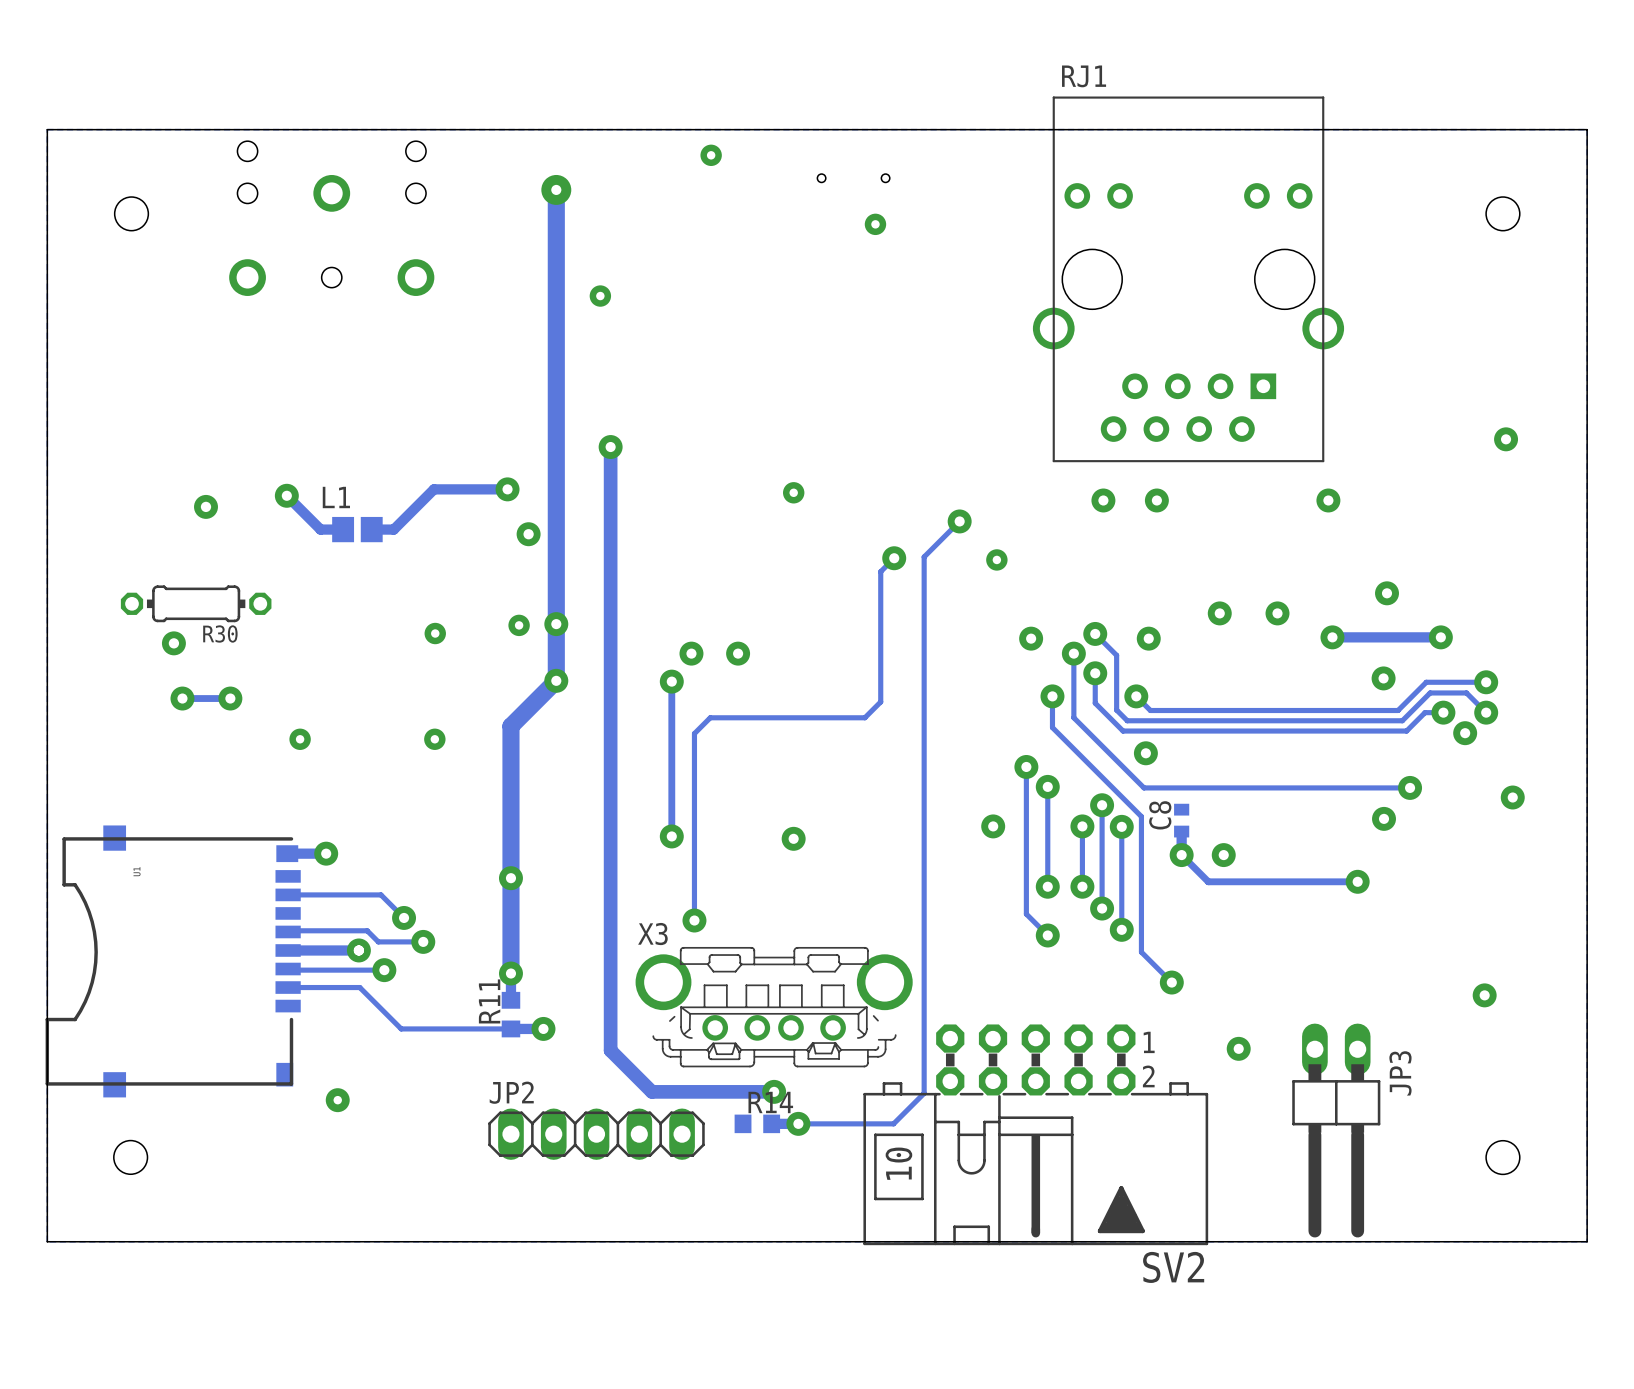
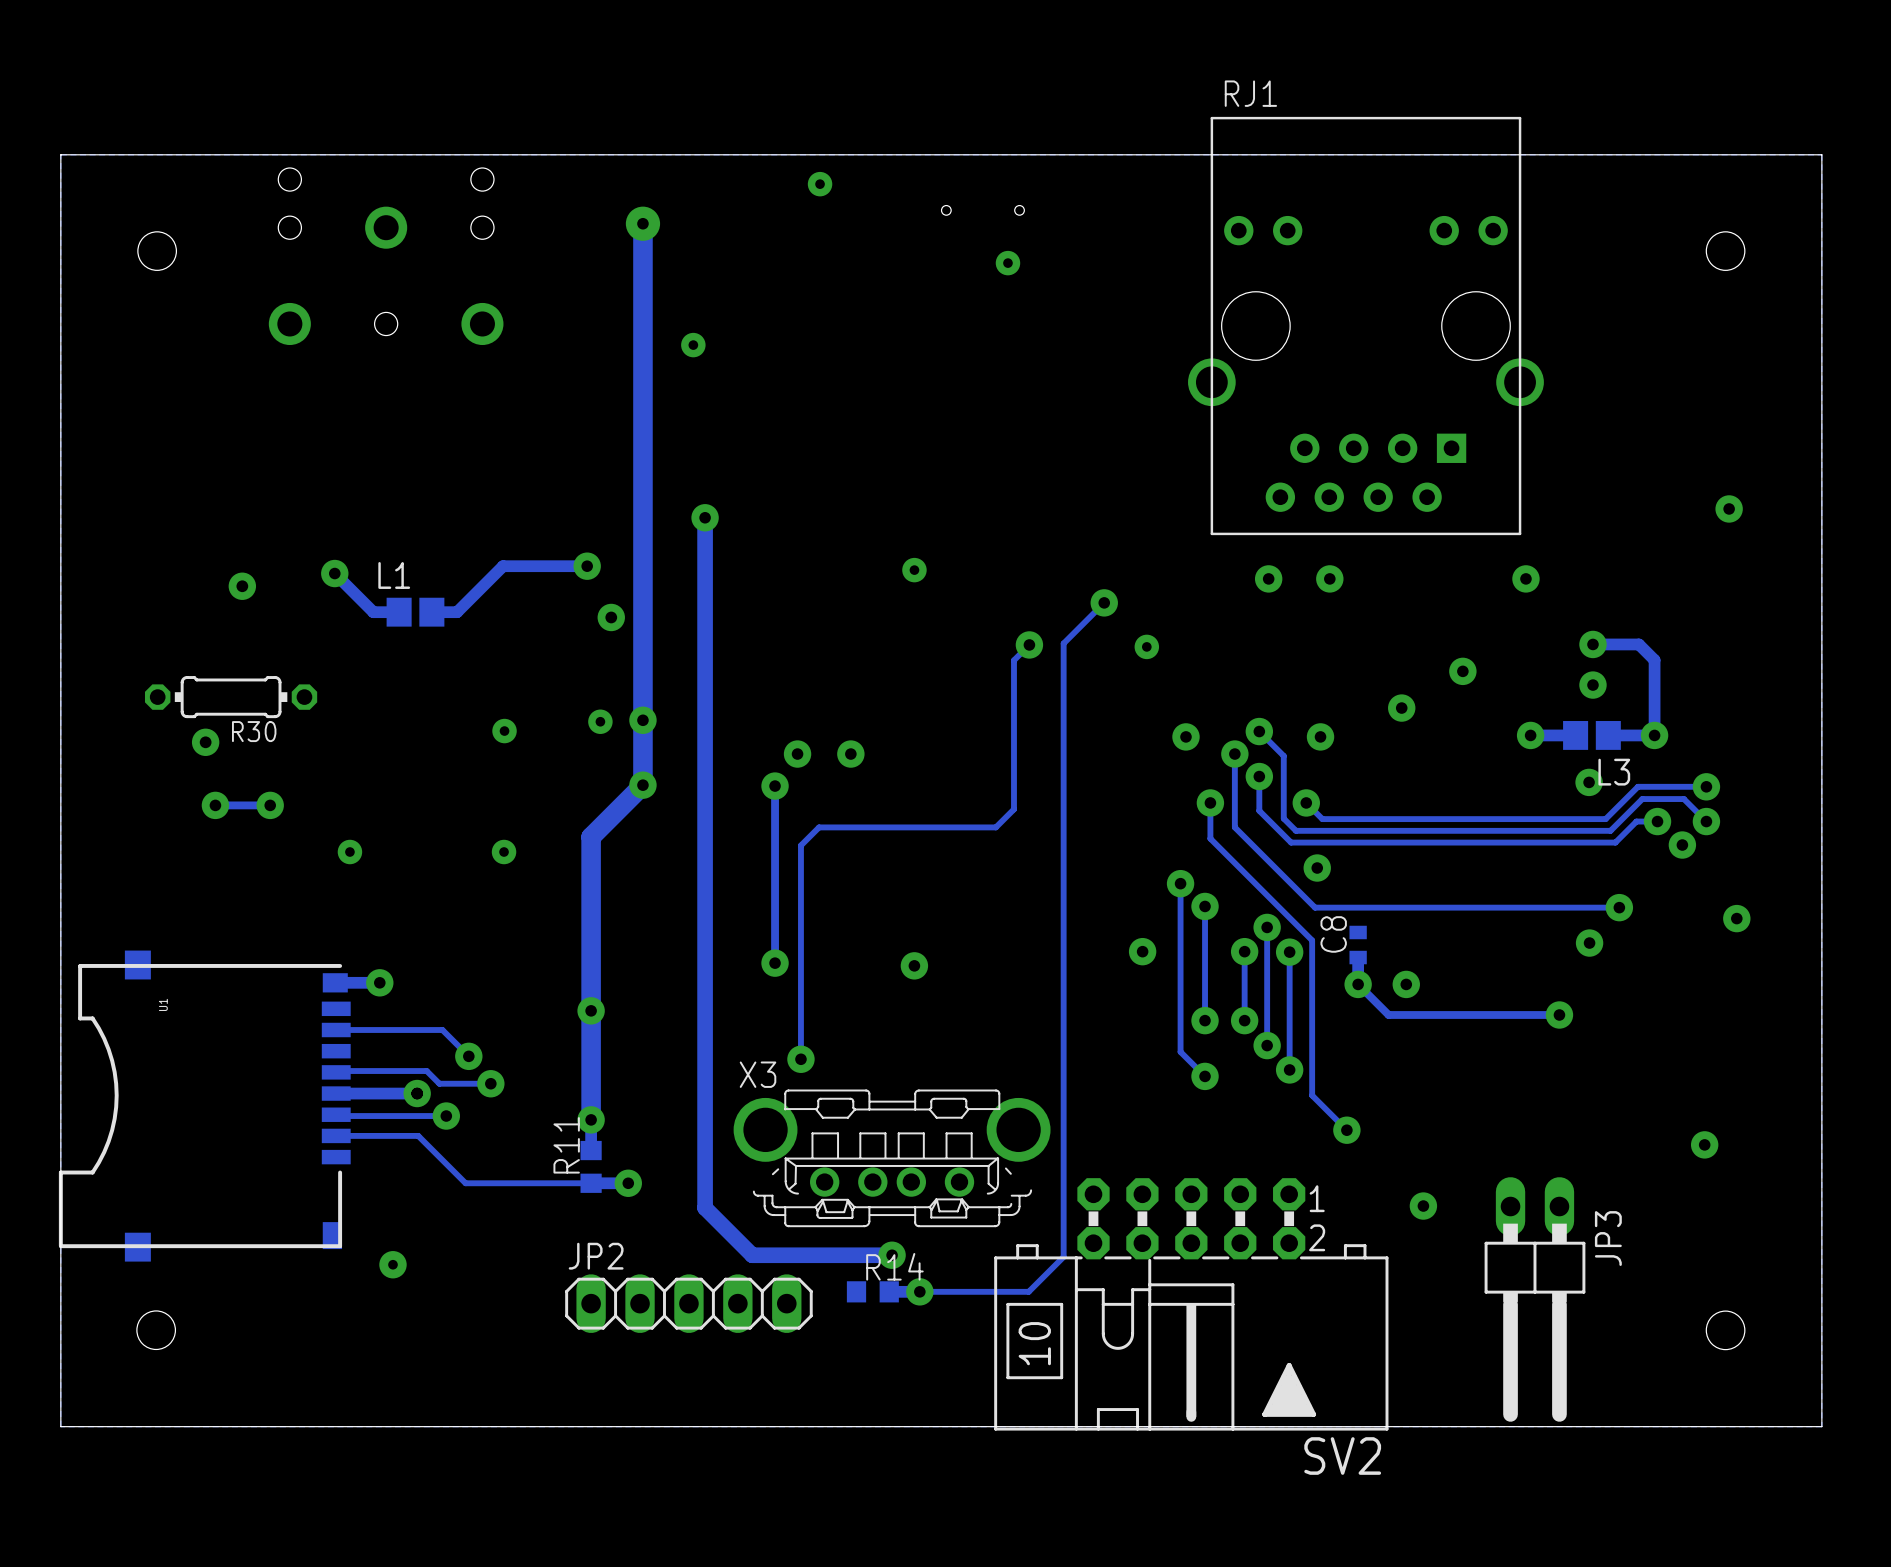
track: none -> (1592, 644) (1638, 644) (1654, 660) (1654, 735)
via: none -> (1592, 644)
via position: (1277, 613) -> (1462, 671)
L3: none -> (1591, 735)
track: (1400, 637) (1371, 637) -> none

